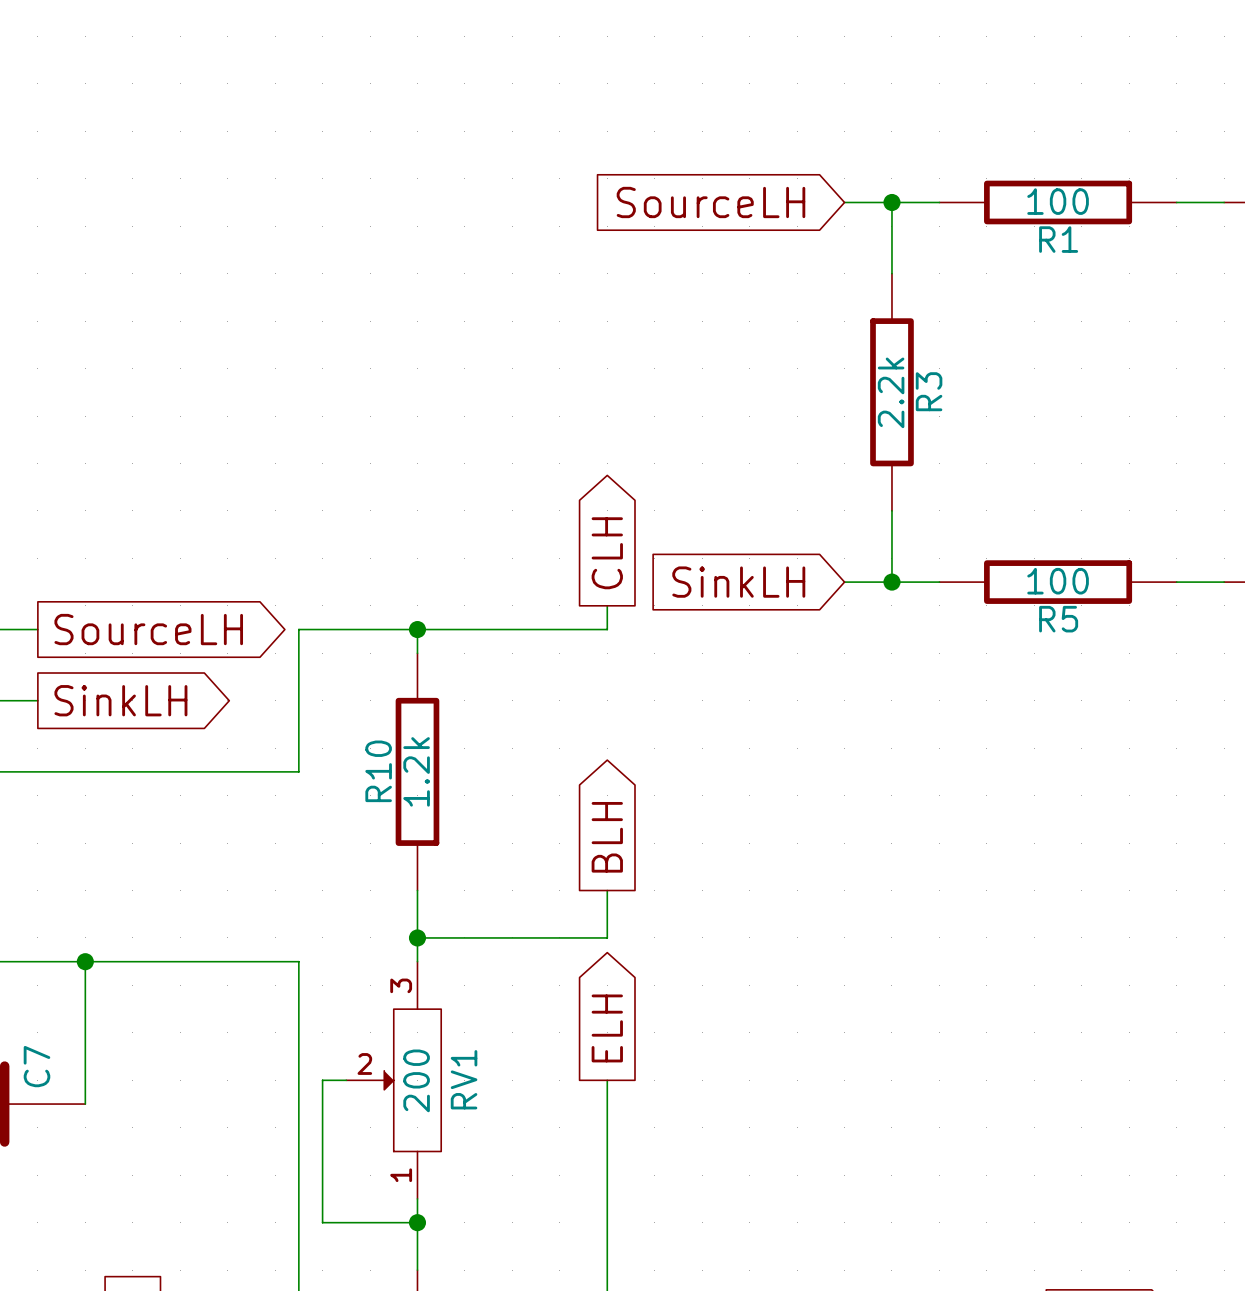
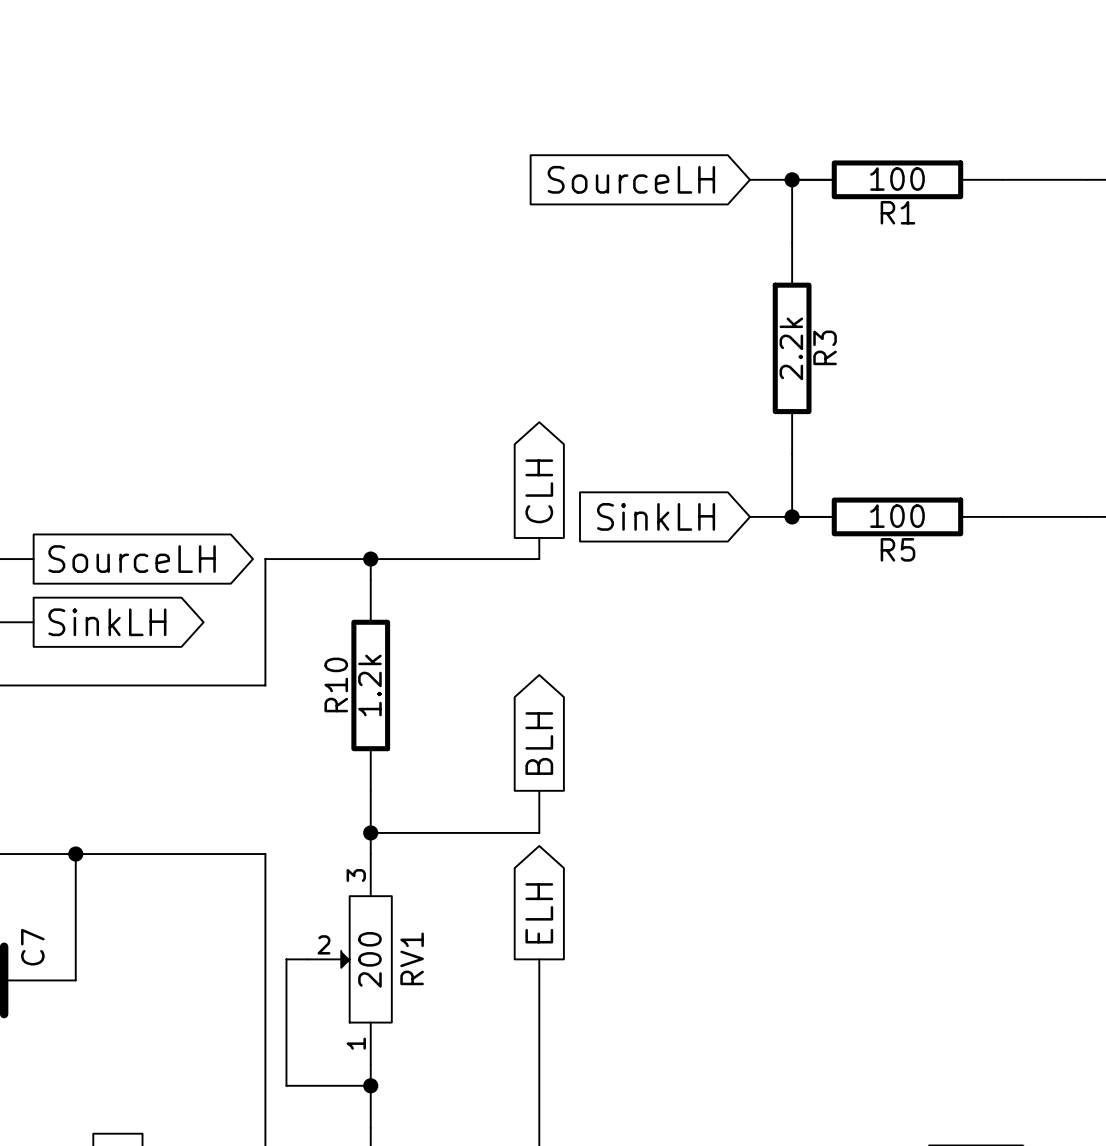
R1 position: (1058, 202) -> (897, 179)
R5 position: (1058, 582) -> (897, 516)

